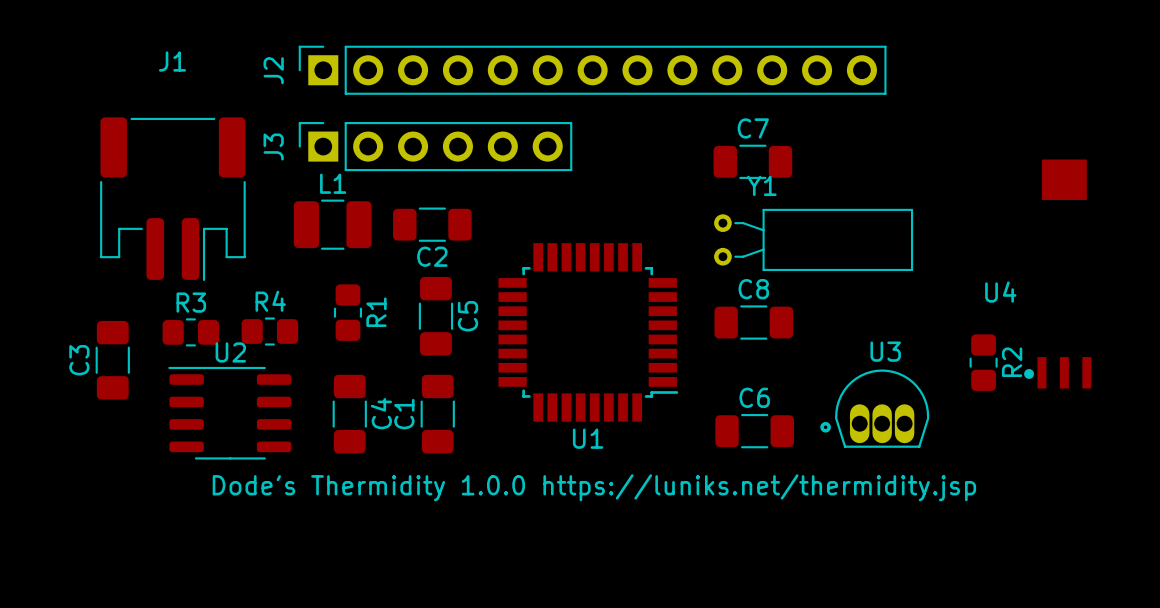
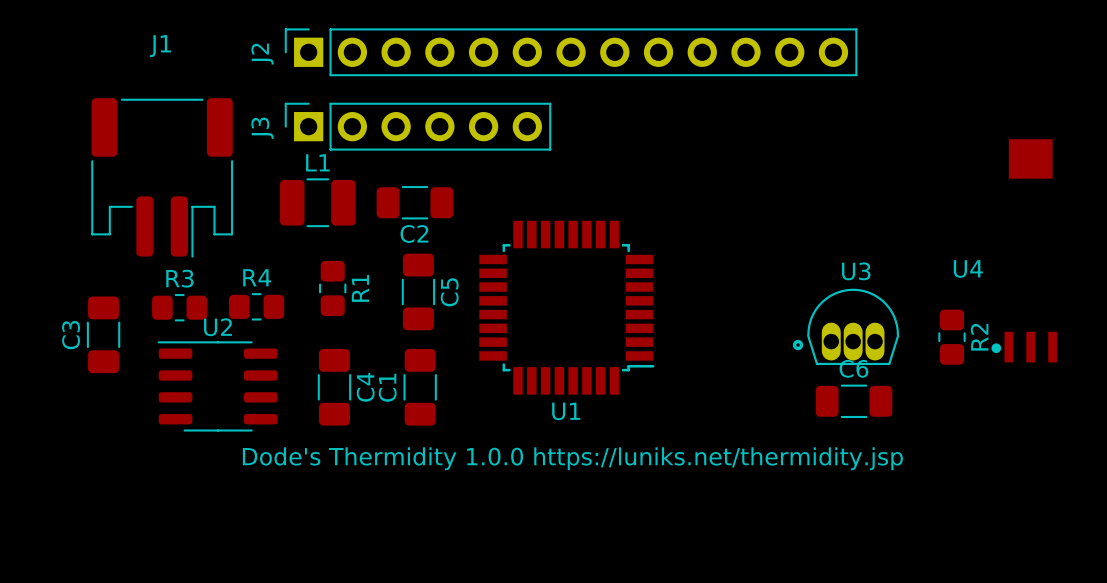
C7: (752, 161) -> none
Y1: (813, 239) -> none
C8: (753, 322) -> none
U3 position: (874, 408) -> (845, 326)
C6 position: (754, 431) -> (854, 401)

